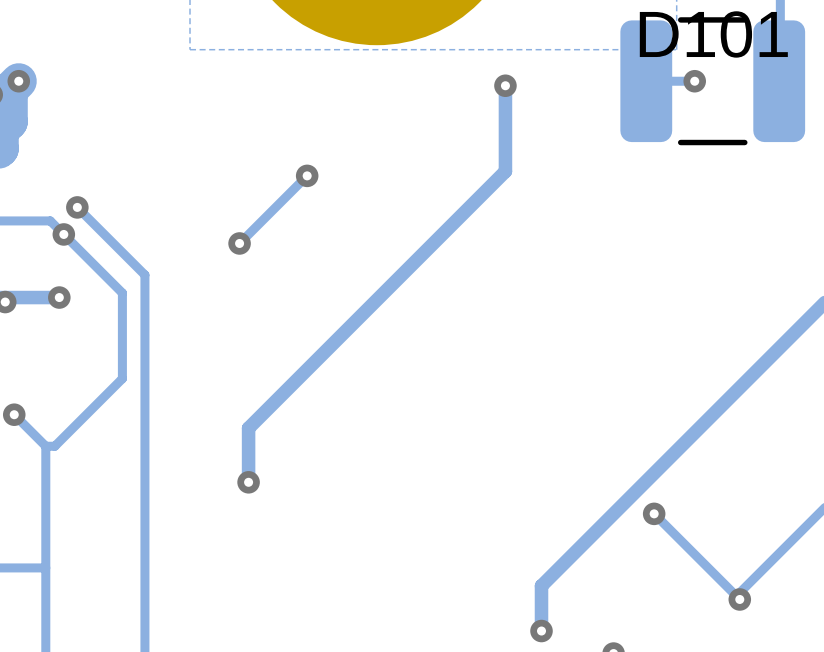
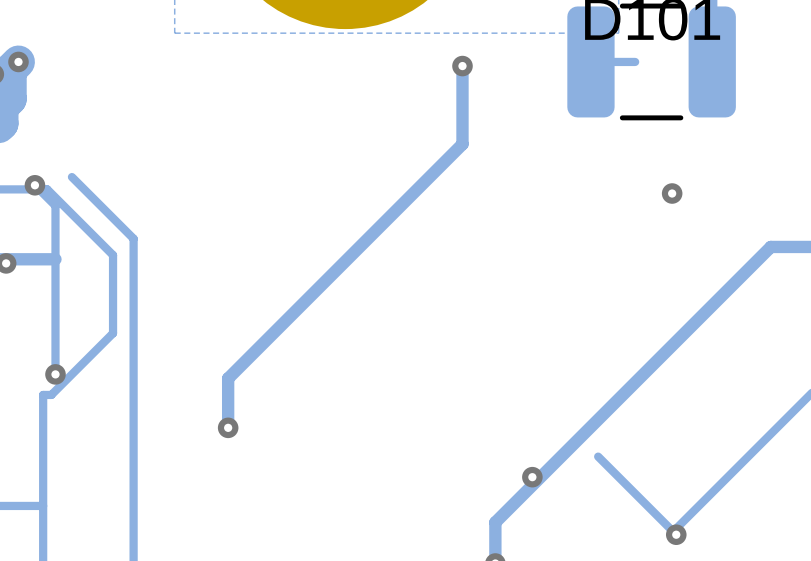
via: (694, 81) -> none
track: (307, 175) (239, 243) -> none
via: (307, 175) -> none
via: (77, 207) -> none
track: none -> (34, 185) (55, 205) (55, 374)
via: none -> (34, 185)
via: none -> (672, 193)
via: (63, 234) -> none
via: (239, 243) -> none
via: (59, 297) -> none
track: (14, 414) (45, 446) -> none
via position: (14, 414) -> (55, 374)
via position: (654, 513) -> (532, 477)

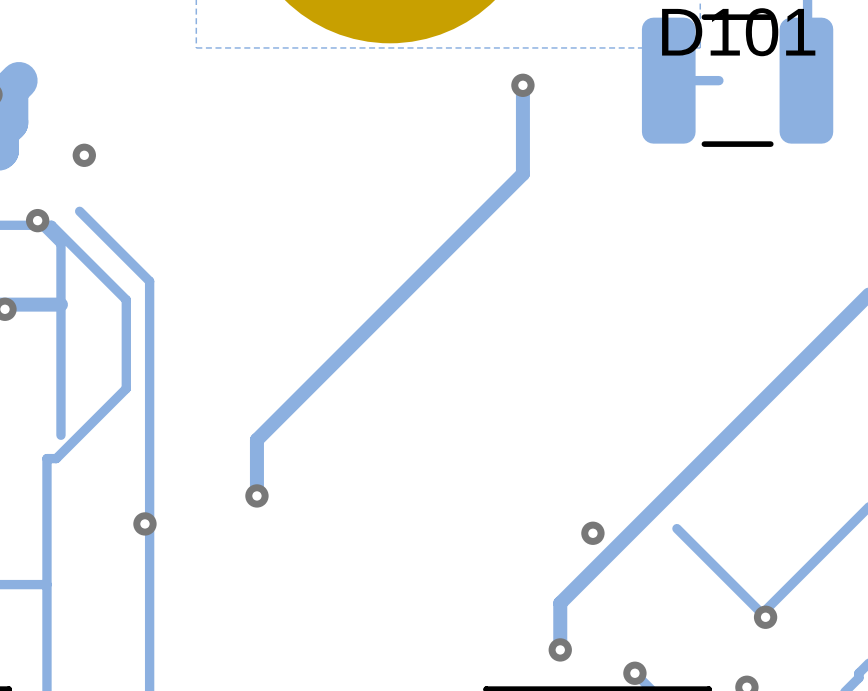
via: (18, 61) -> none
via: none -> (84, 155)
via: (672, 193) -> none
via: (55, 374) -> none
via: none -> (144, 523)
via position: (532, 477) -> (592, 533)

